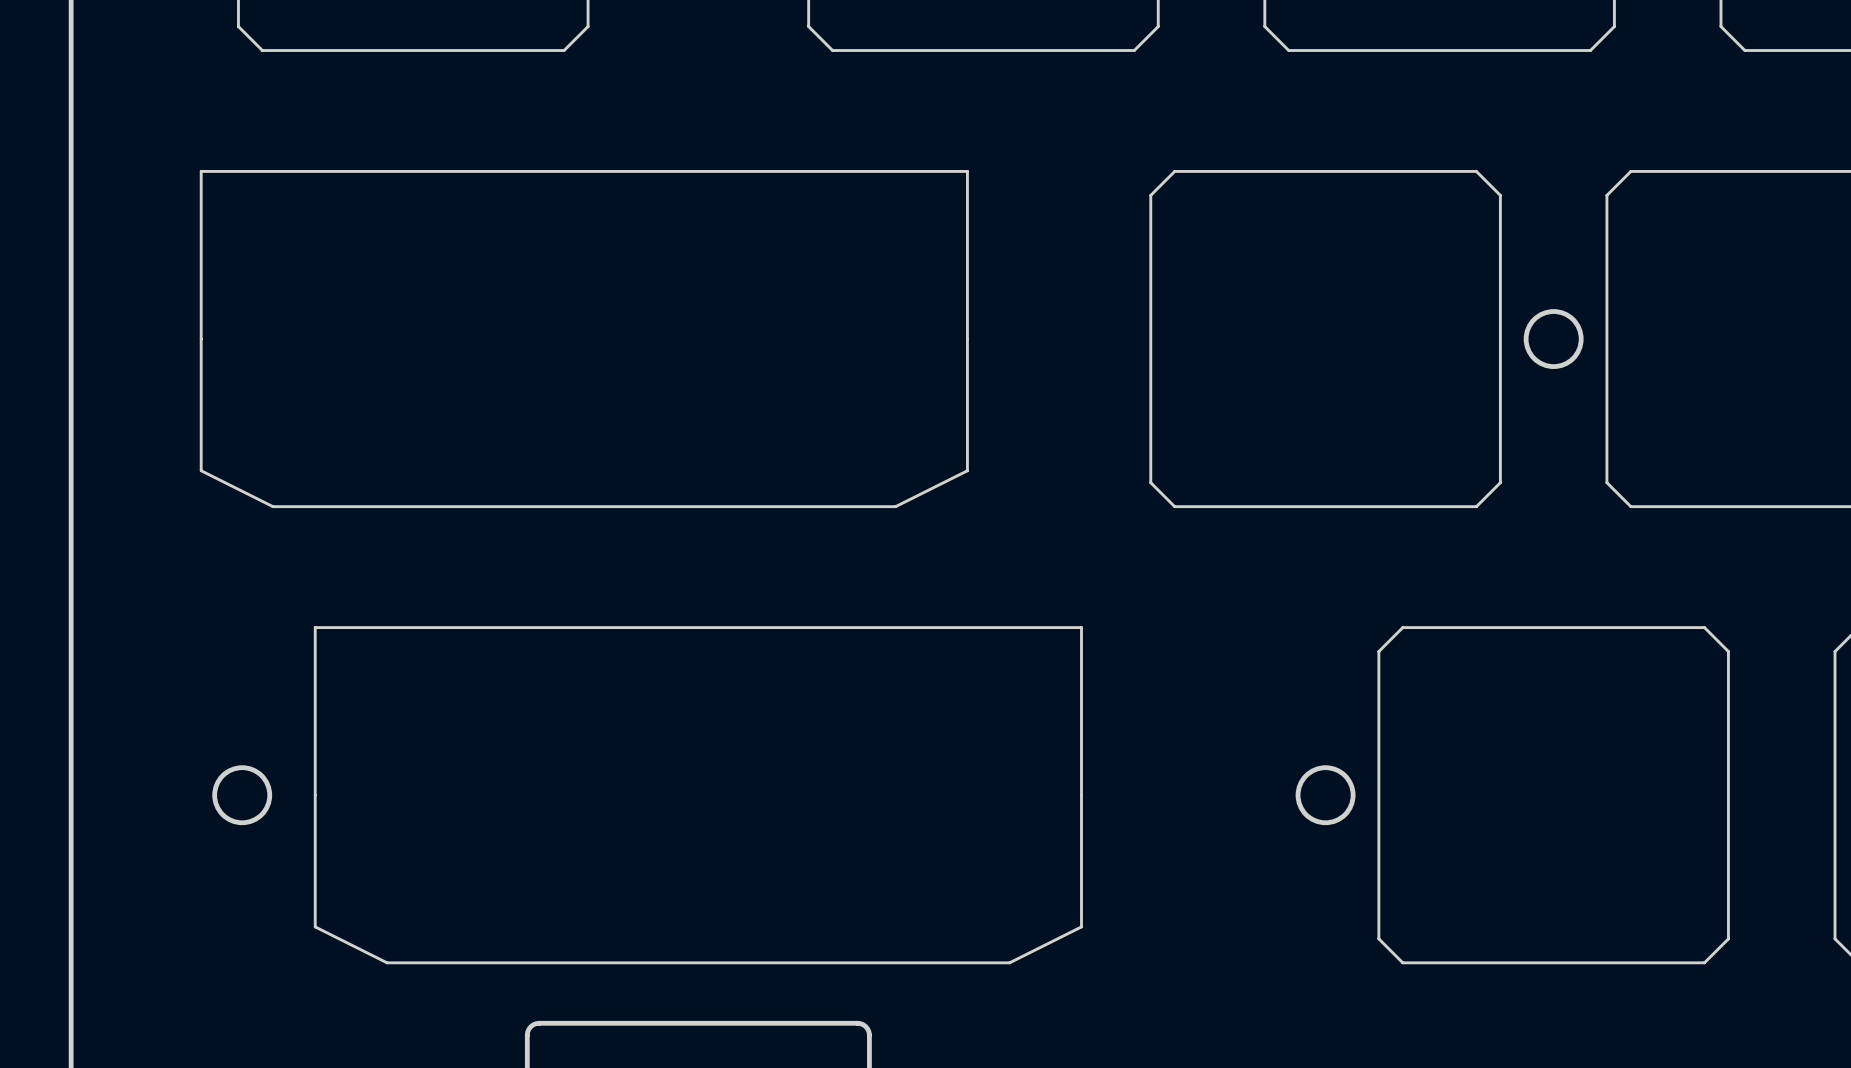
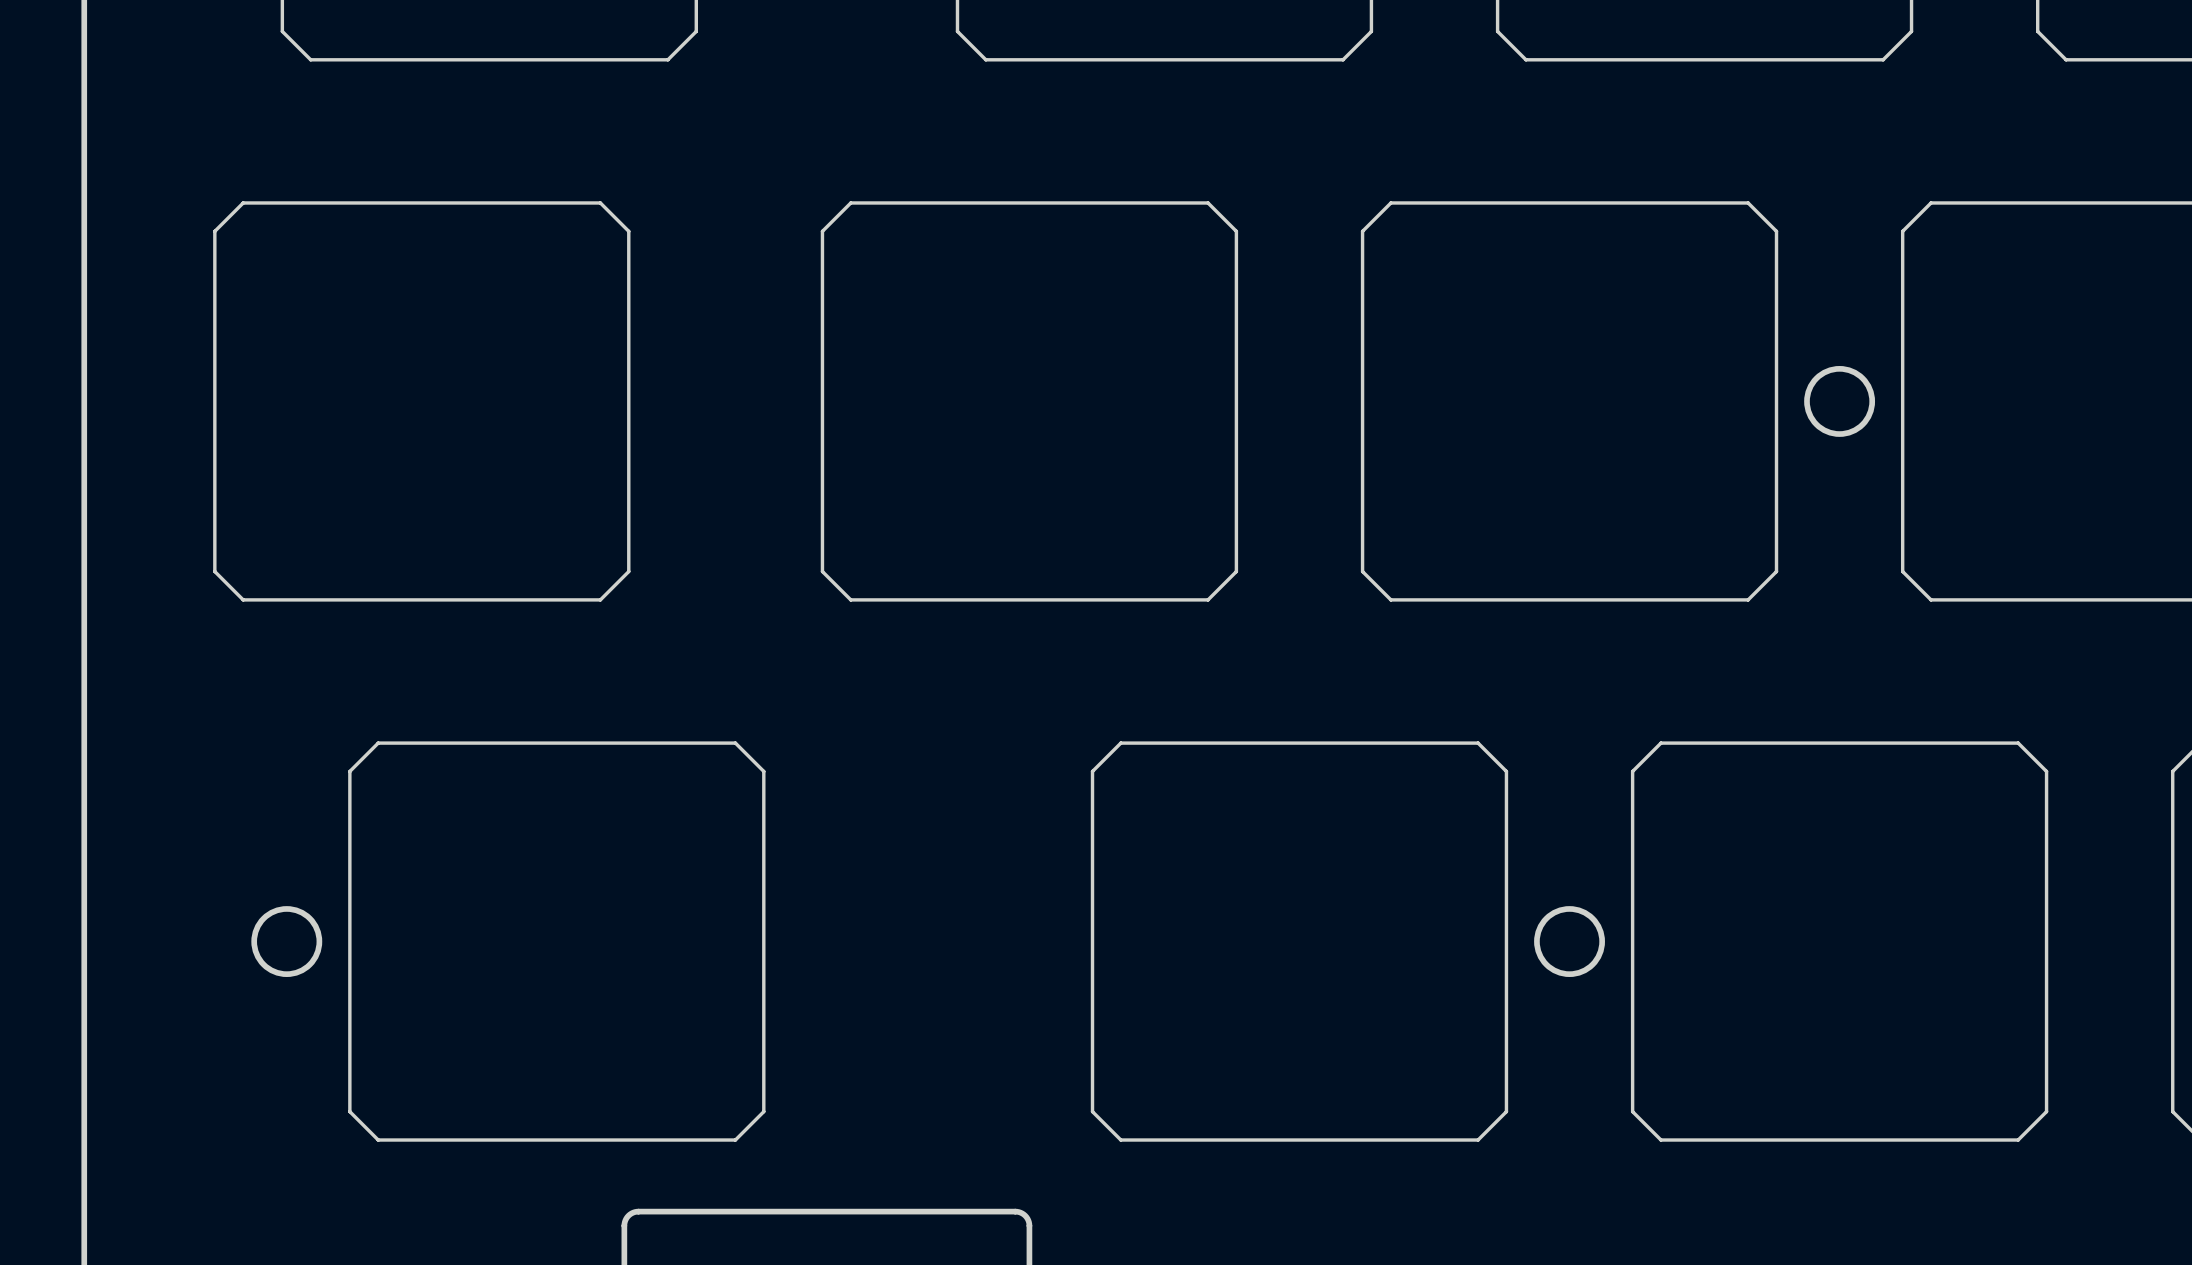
drawing: none -> [213, 201, 631, 602]
drawing: [199, 169, 969, 509] -> none
drawing: none -> [820, 201, 1239, 602]
drawing: none -> [348, 741, 766, 1142]
drawing: [313, 626, 1083, 965] -> none
drawing: none -> [1090, 741, 1509, 1142]

